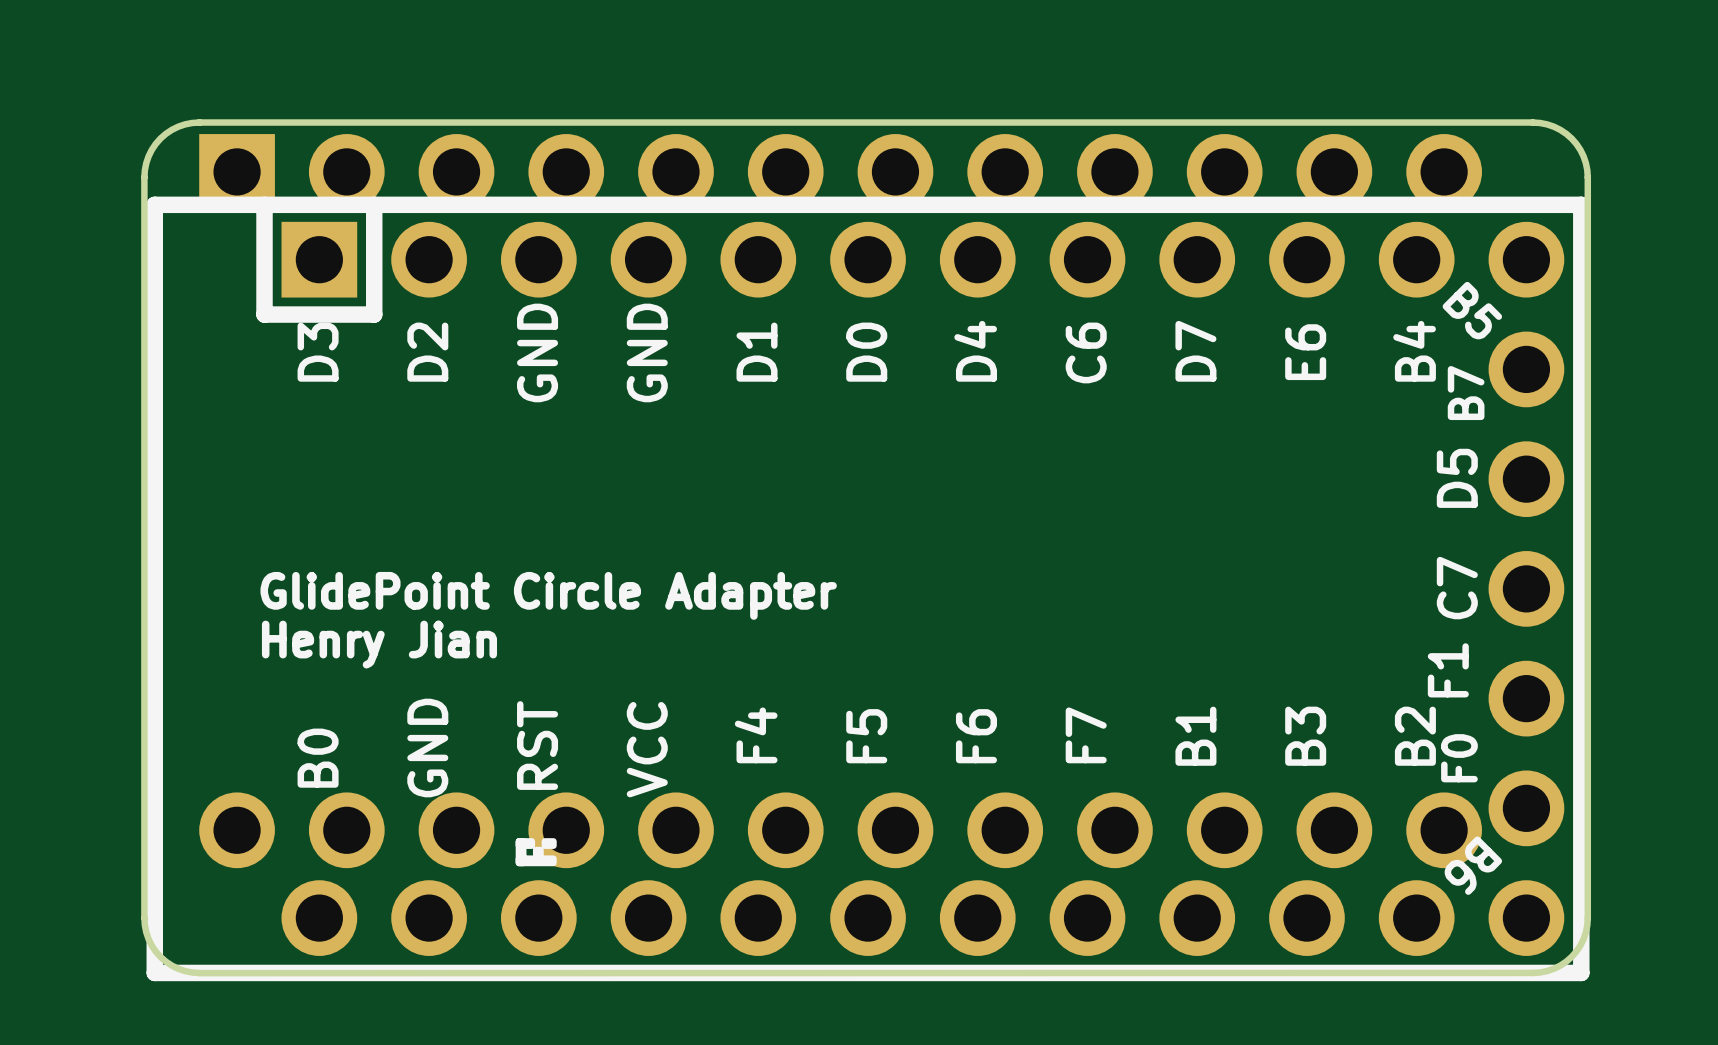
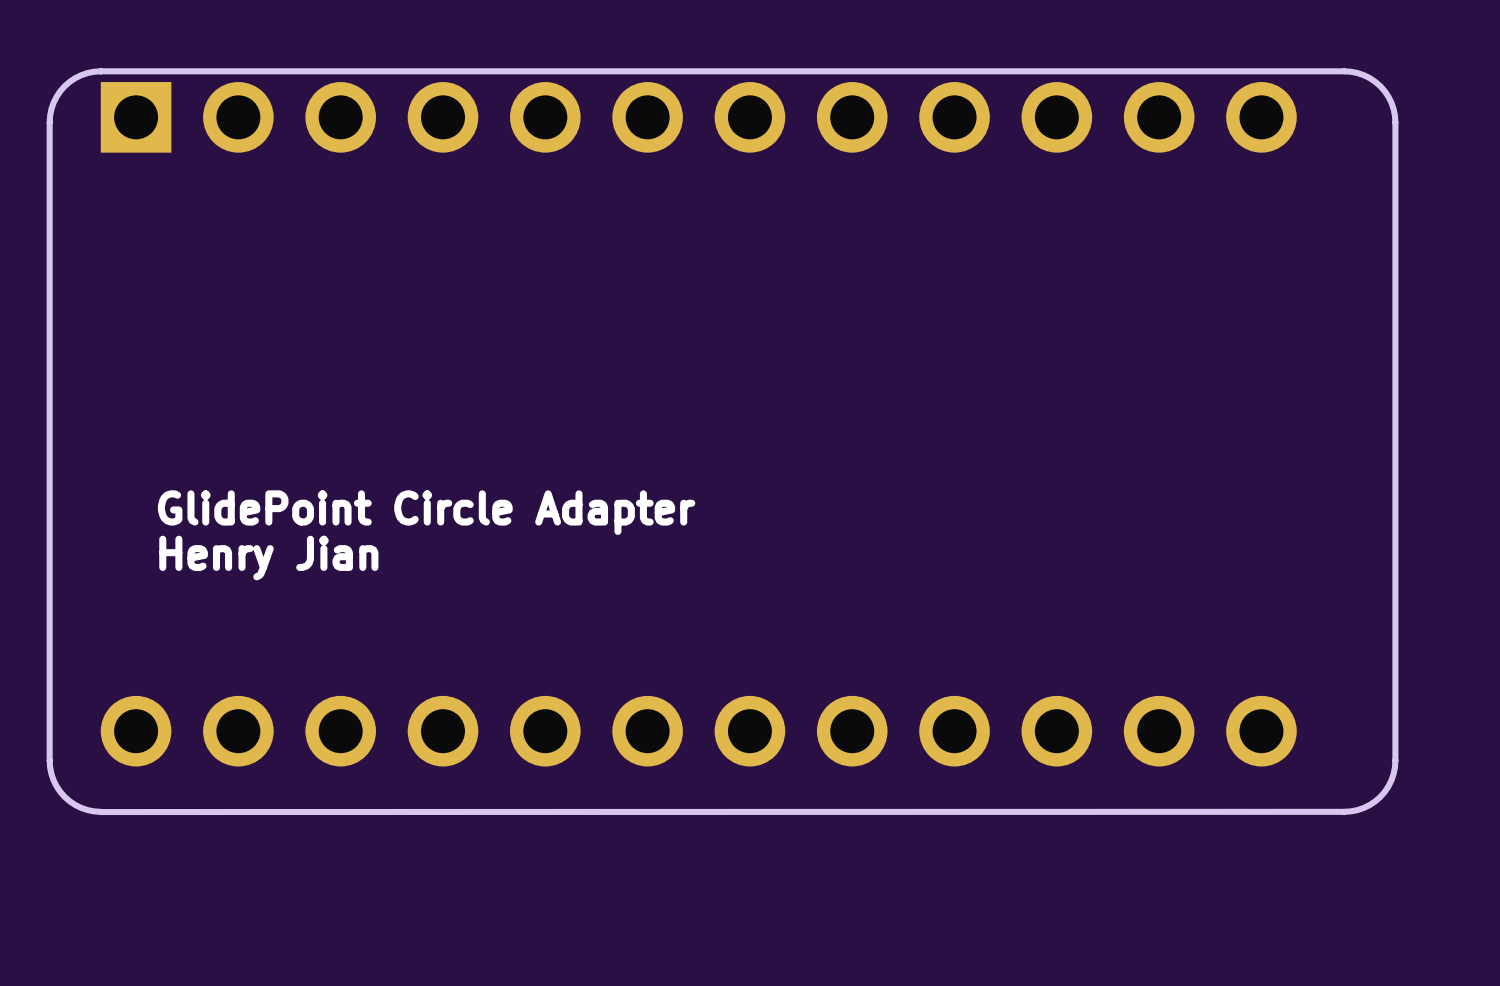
part: (868, 588) -> none
board edge: (144, 861) (144, 925) (151, 945) (160, 956) (171, 965) (185, 971) (199, 972) -> (49, 760) (53, 780) (64, 796) (81, 807) (100, 811)
board edge: (1587, 861) (1587, 918) (1583, 939) (1576, 951) (1566, 961) (1553, 968) (1540, 972) (199, 973) -> (1395, 760) (1391, 780) (1380, 796) (1363, 807) (1344, 811) (100, 812)

